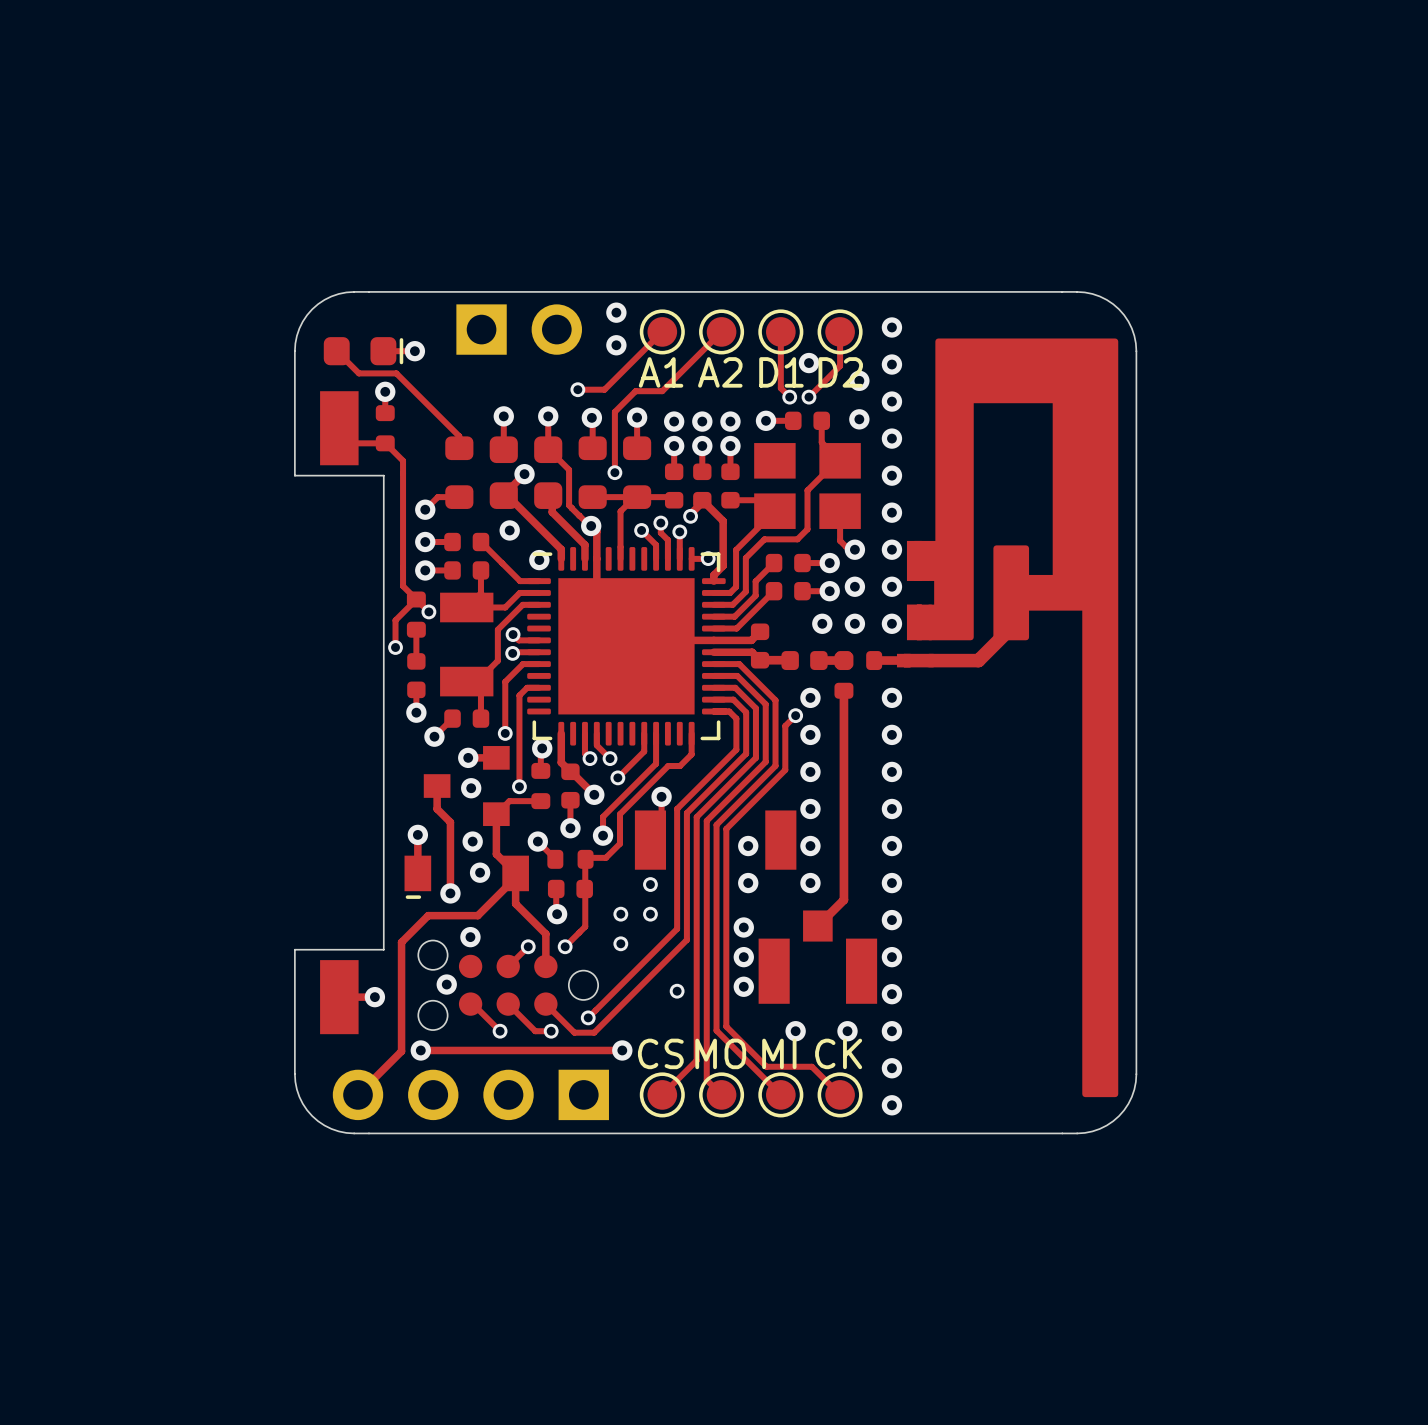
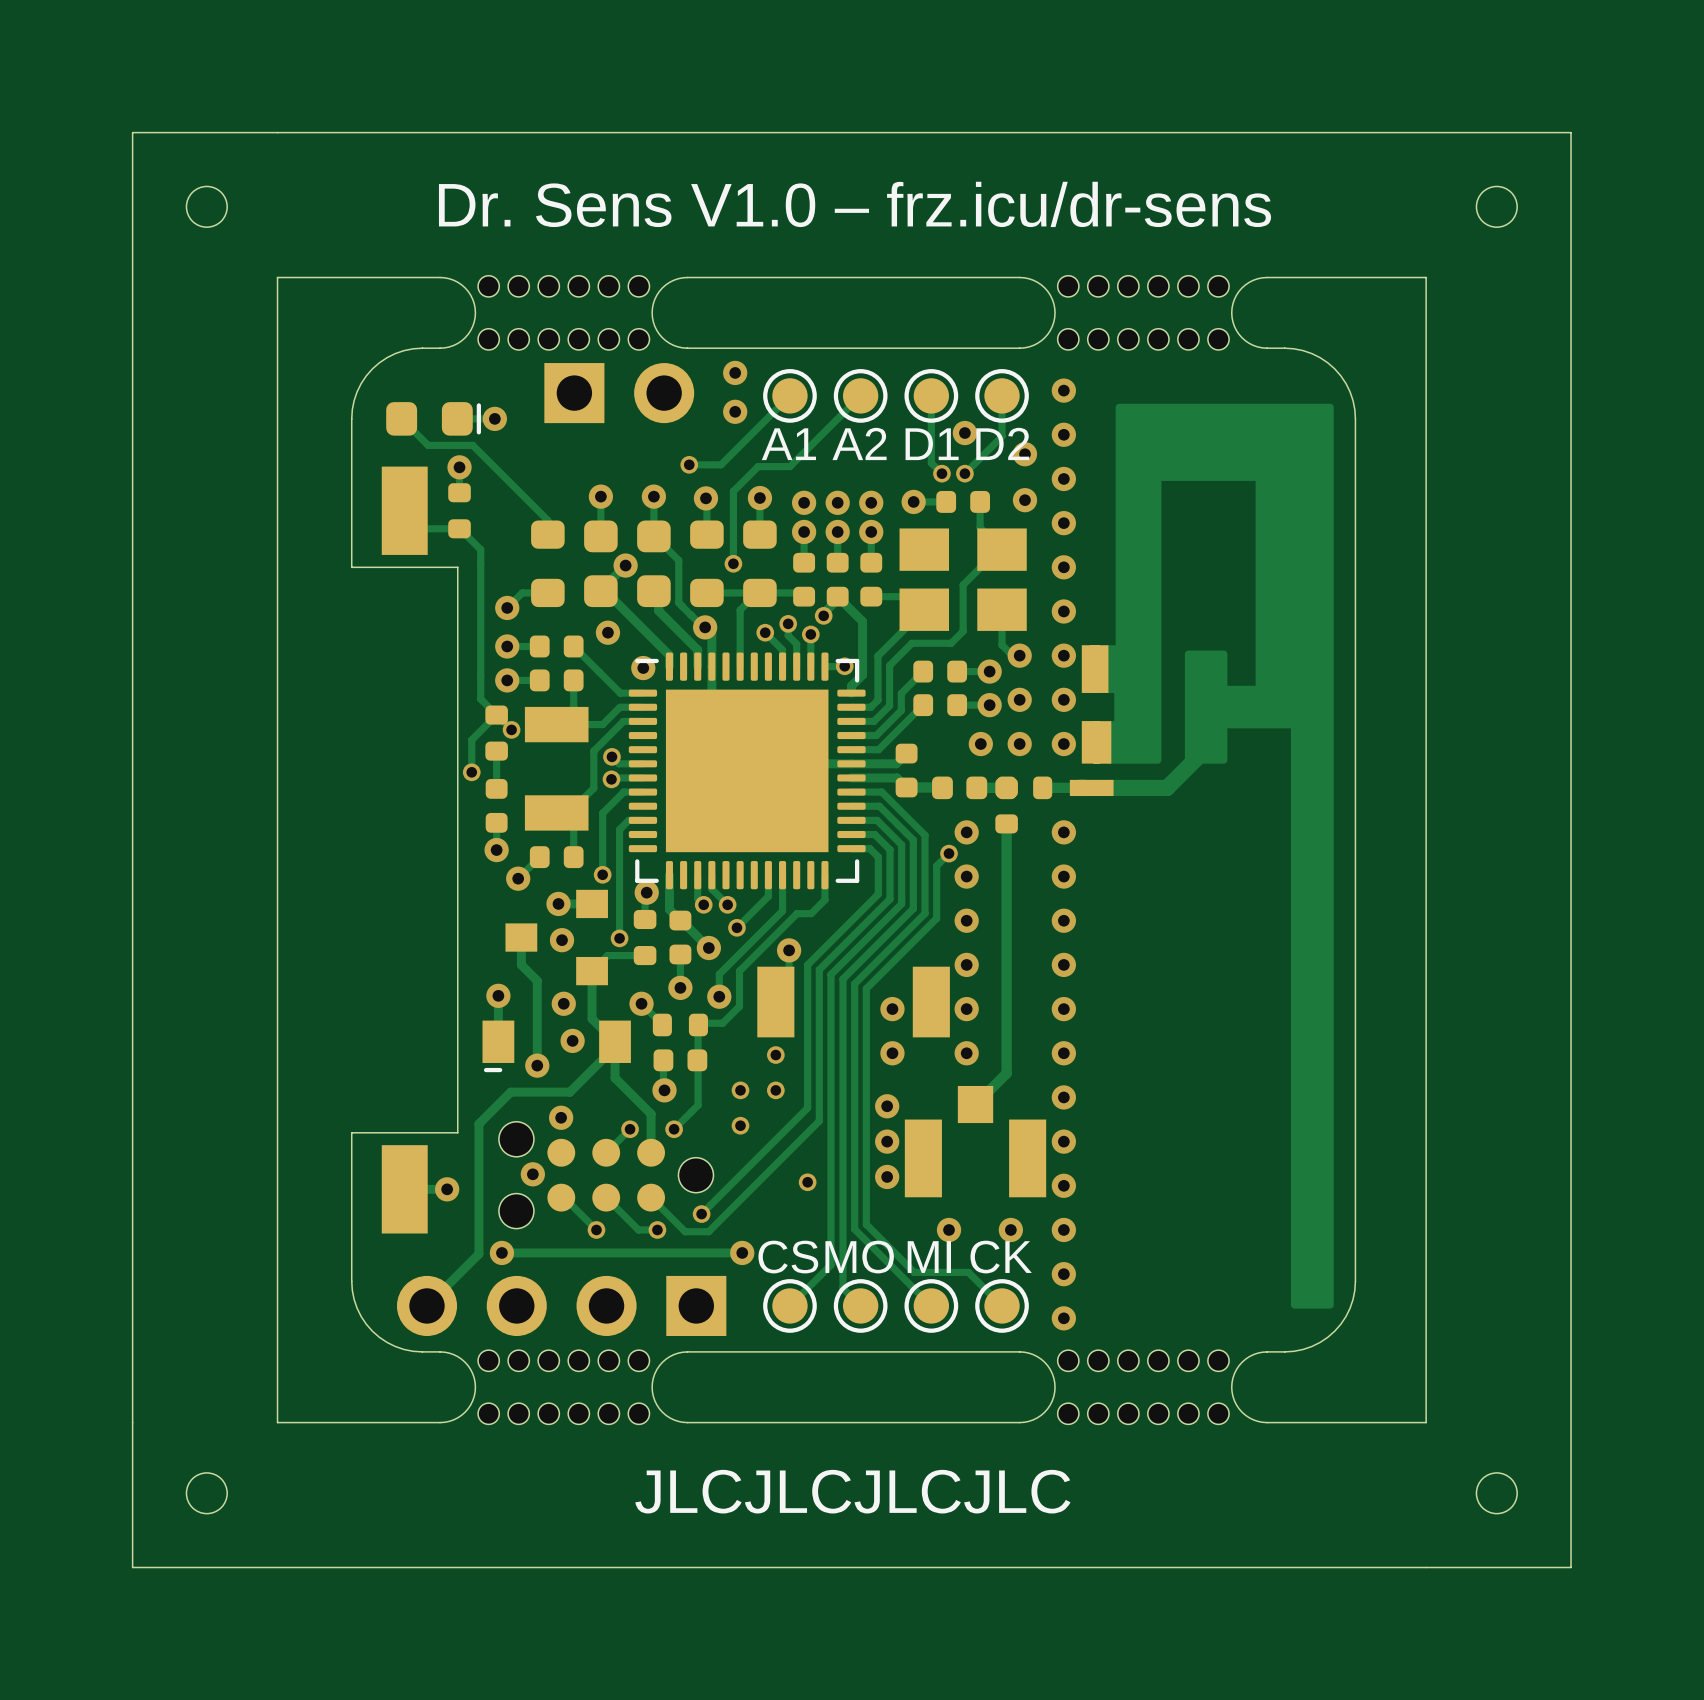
board edge: none -> (132, 132) (132, 1567) (1571, 1567) (1571, 132) (132, 132)
round board edge: none -> [185, 185, 228, 228]
round board edge: none -> [1475, 185, 1518, 228]
text: none -> Dr. Sens V1.0 – frz.icu/dr-sens (855, 204)
part: none -> (563, 312)
part: none -> (1143, 312)
board edge: (368, 291) (576, 291) -> (1019, 348) (1033, 345) (1044, 337) (1052, 326) (1055, 312) (1052, 299) (1044, 287) (1033, 280) (1019, 277) (678, 278) (665, 284) (659, 291) (653, 303) (652, 317) (656, 330) (662, 337) (673, 345) (687, 348)
board edge: none -> (440, 348) (453, 345) (465, 337) (470, 330) (475, 317) (475, 308) (470, 295) (465, 287) (453, 280) (440, 277) (277, 277) (277, 1422) (440, 1422) (453, 1419) (465, 1412) (470, 1404) (475, 1391) (475, 1382) (470, 1369) (465, 1362) (453, 1354) (440, 1351)
board edge: (854, 291) (1062, 291) -> (1267, 1351) (1253, 1354) (1242, 1362) (1236, 1369) (1232, 1382) (1232, 1391) (1236, 1404) (1242, 1412) (1253, 1419) (1267, 1422) (1426, 1422) (1426, 277) (1267, 277) (1253, 280) (1242, 287) (1236, 295) (1232, 308) (1232, 317) (1236, 330) (1242, 337) (1253, 345) (1267, 348)
board edge: (368, 1133) (576, 1133) -> (1019, 1351) (1033, 1354) (1044, 1362) (1052, 1373) (1055, 1387) (1052, 1400) (1044, 1412) (1033, 1419) (1019, 1422) (678, 1421) (665, 1415) (659, 1408) (653, 1396) (652, 1382) (656, 1369) (662, 1362) (673, 1354) (687, 1351)
board edge: (854, 1133) (1062, 1133) -> none
part: none -> (563, 1387)
part: none -> (1143, 1387)
round board edge: none -> [185, 1472, 228, 1515]
round board edge: none -> [1475, 1472, 1518, 1515]
text: none -> JLCJLCJLCJLC (852, 1491)

